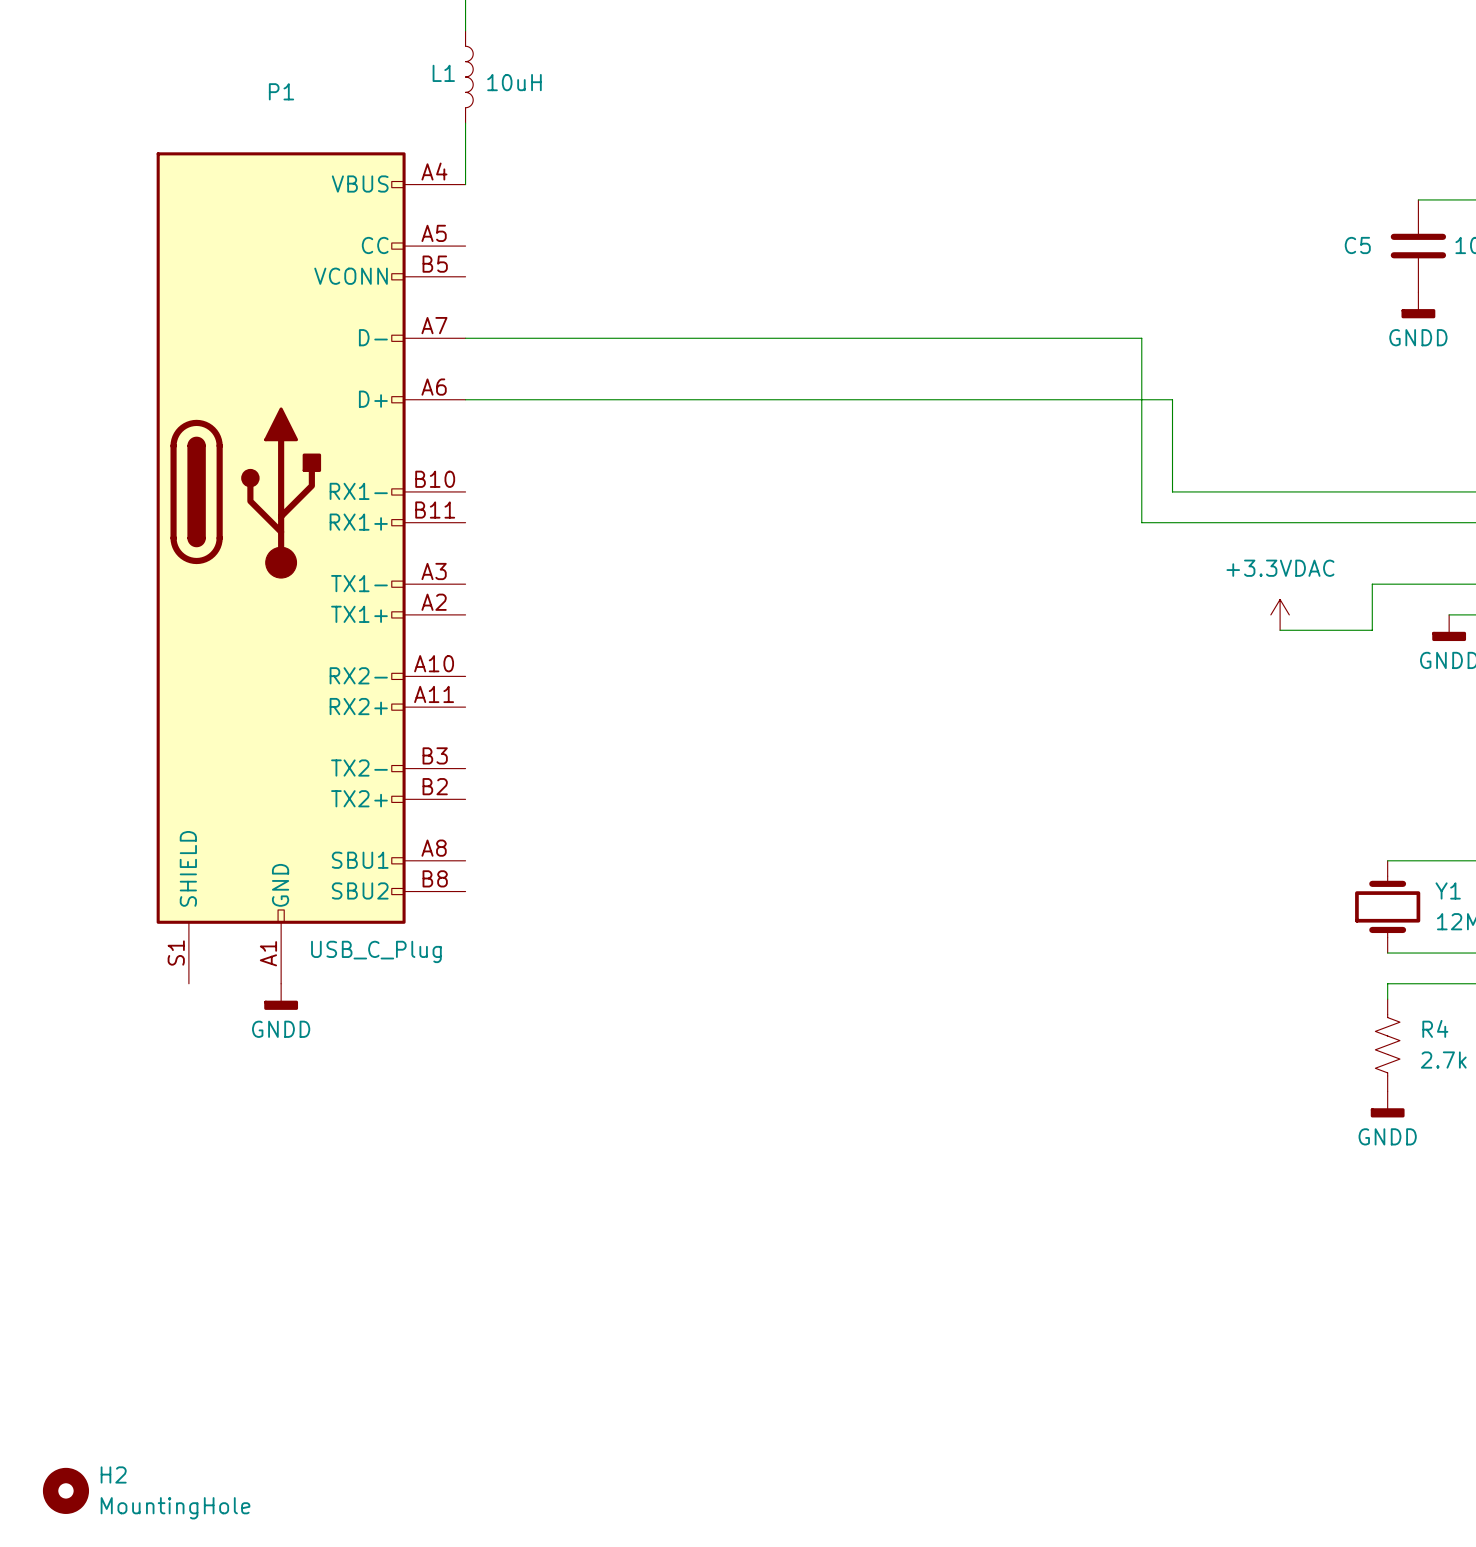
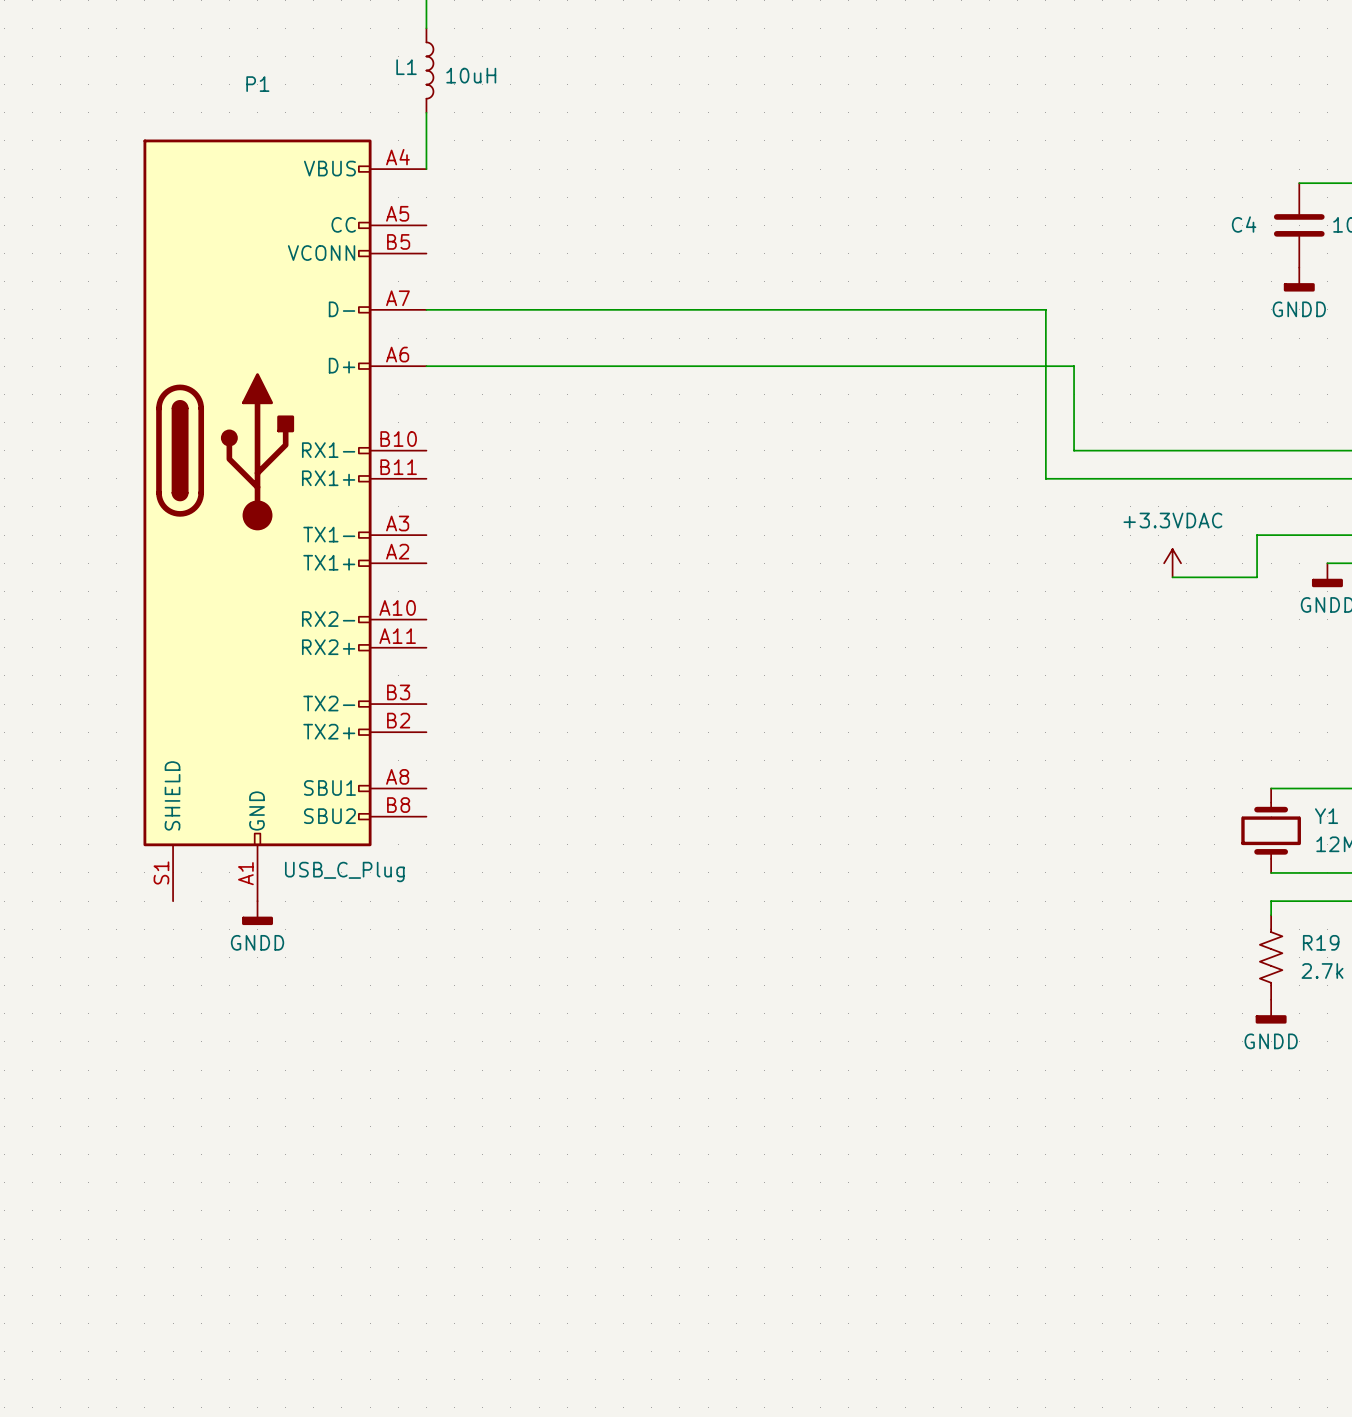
C5 name: C5 (1357, 245) -> C4 (1244, 224)
R4 name: R4 (1435, 1028) -> R19 (1321, 942)
H2: MountingHole (65, 1490) -> none

